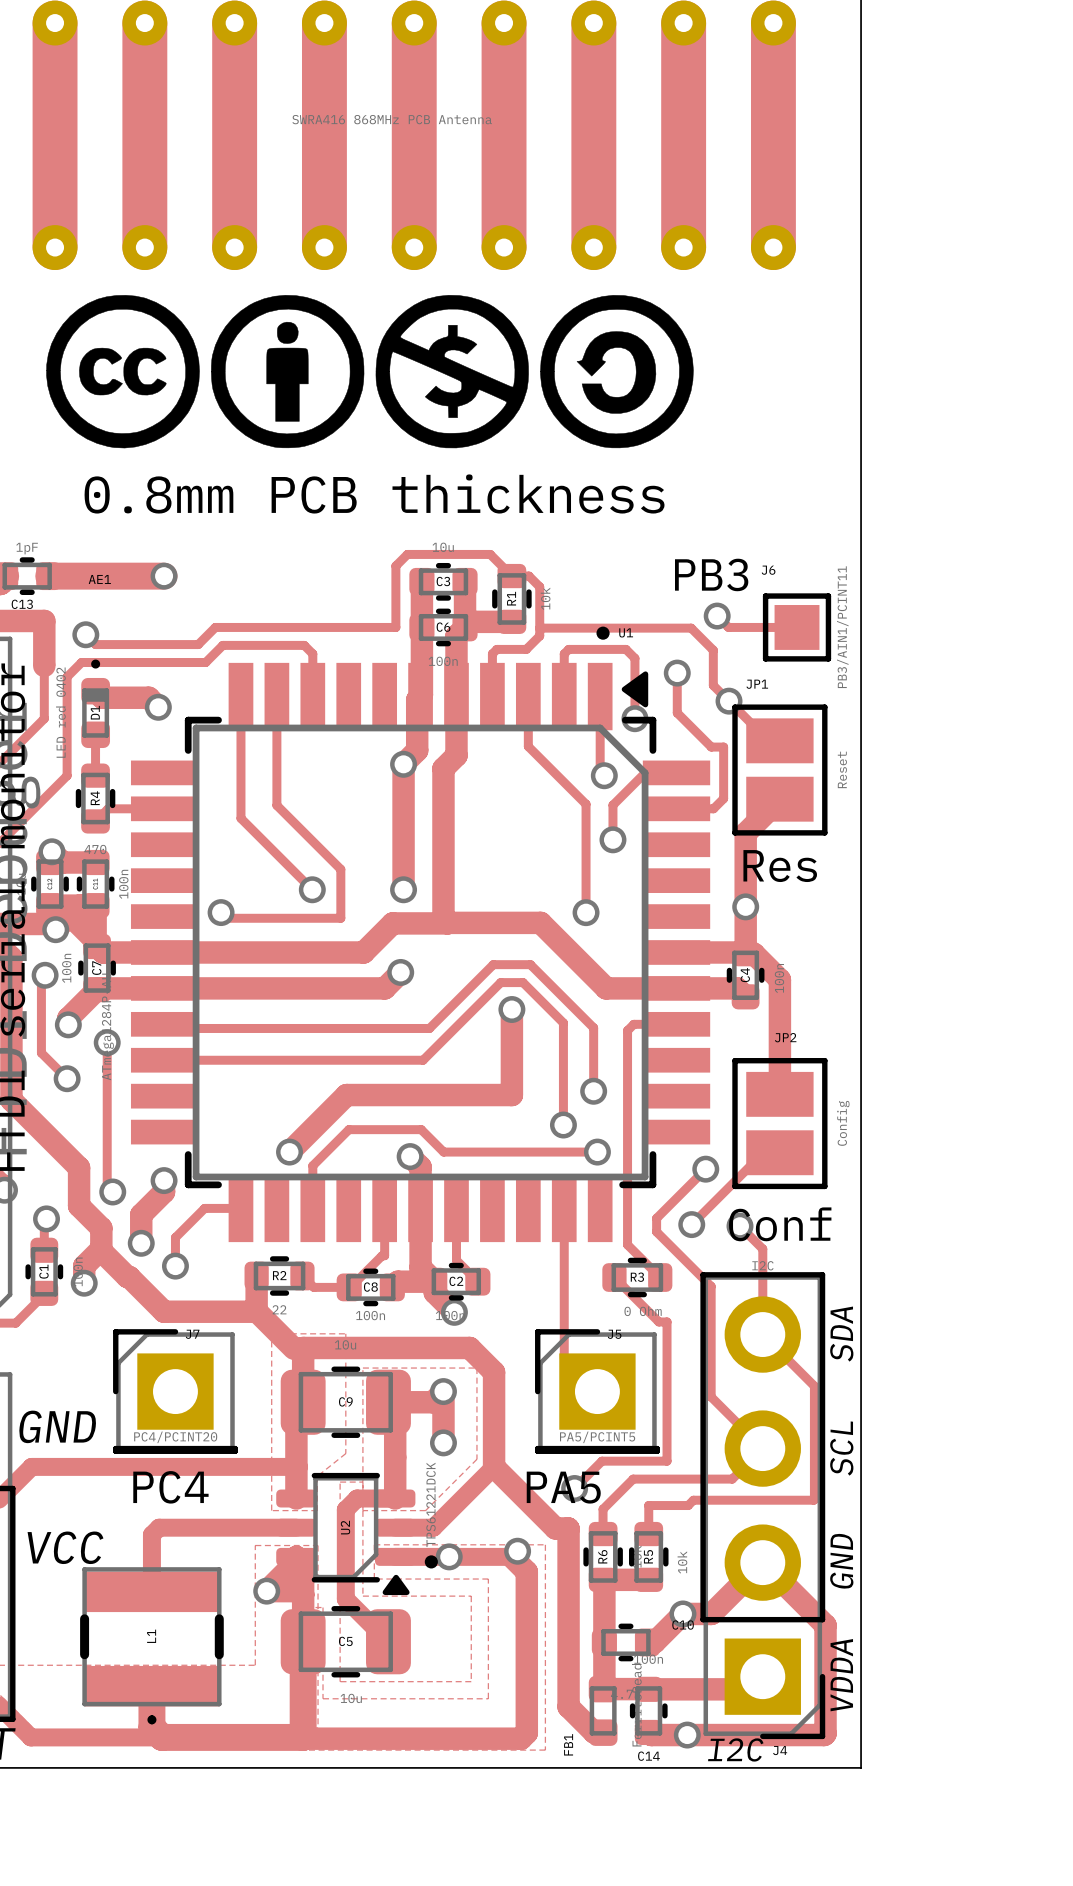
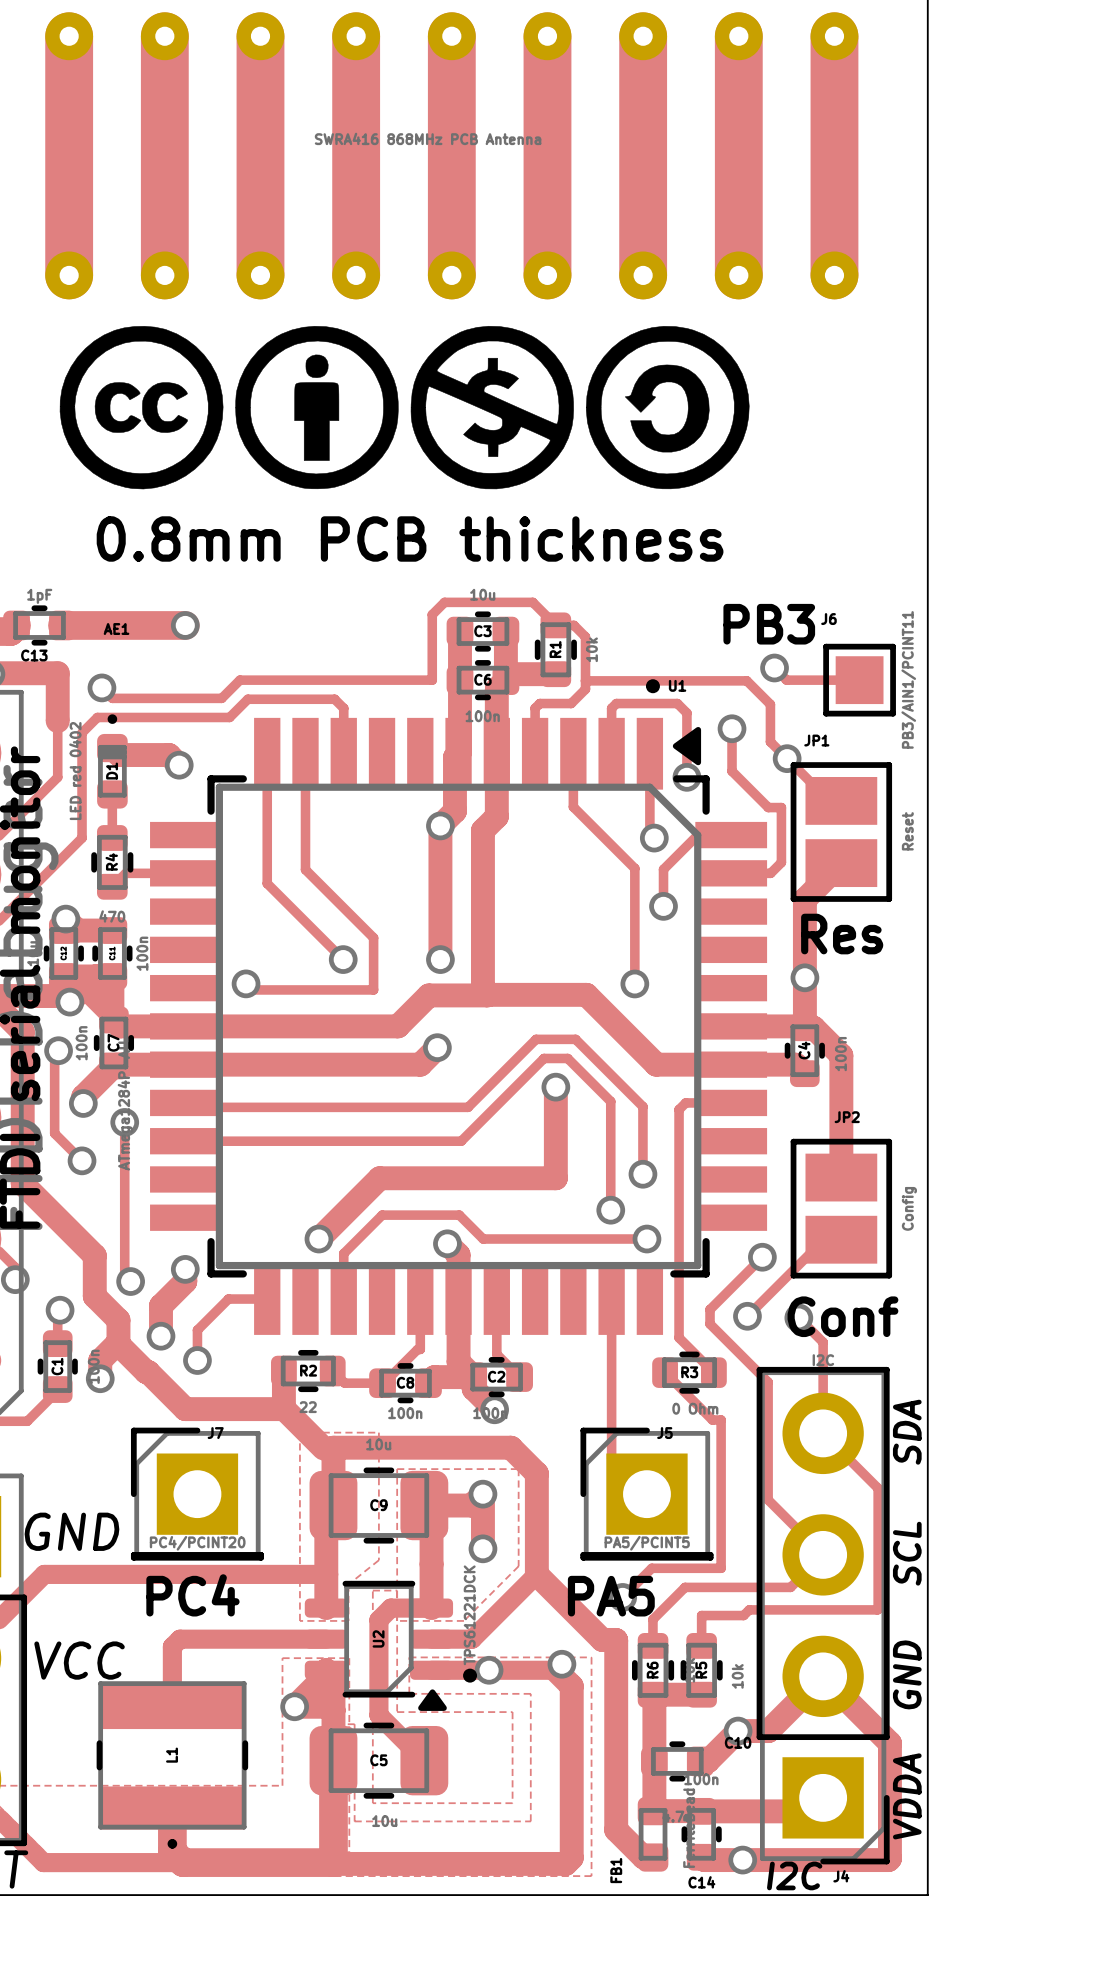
L1 footprint: [80, 1567, 224, 1725] -> [96, 1681, 249, 1849]

